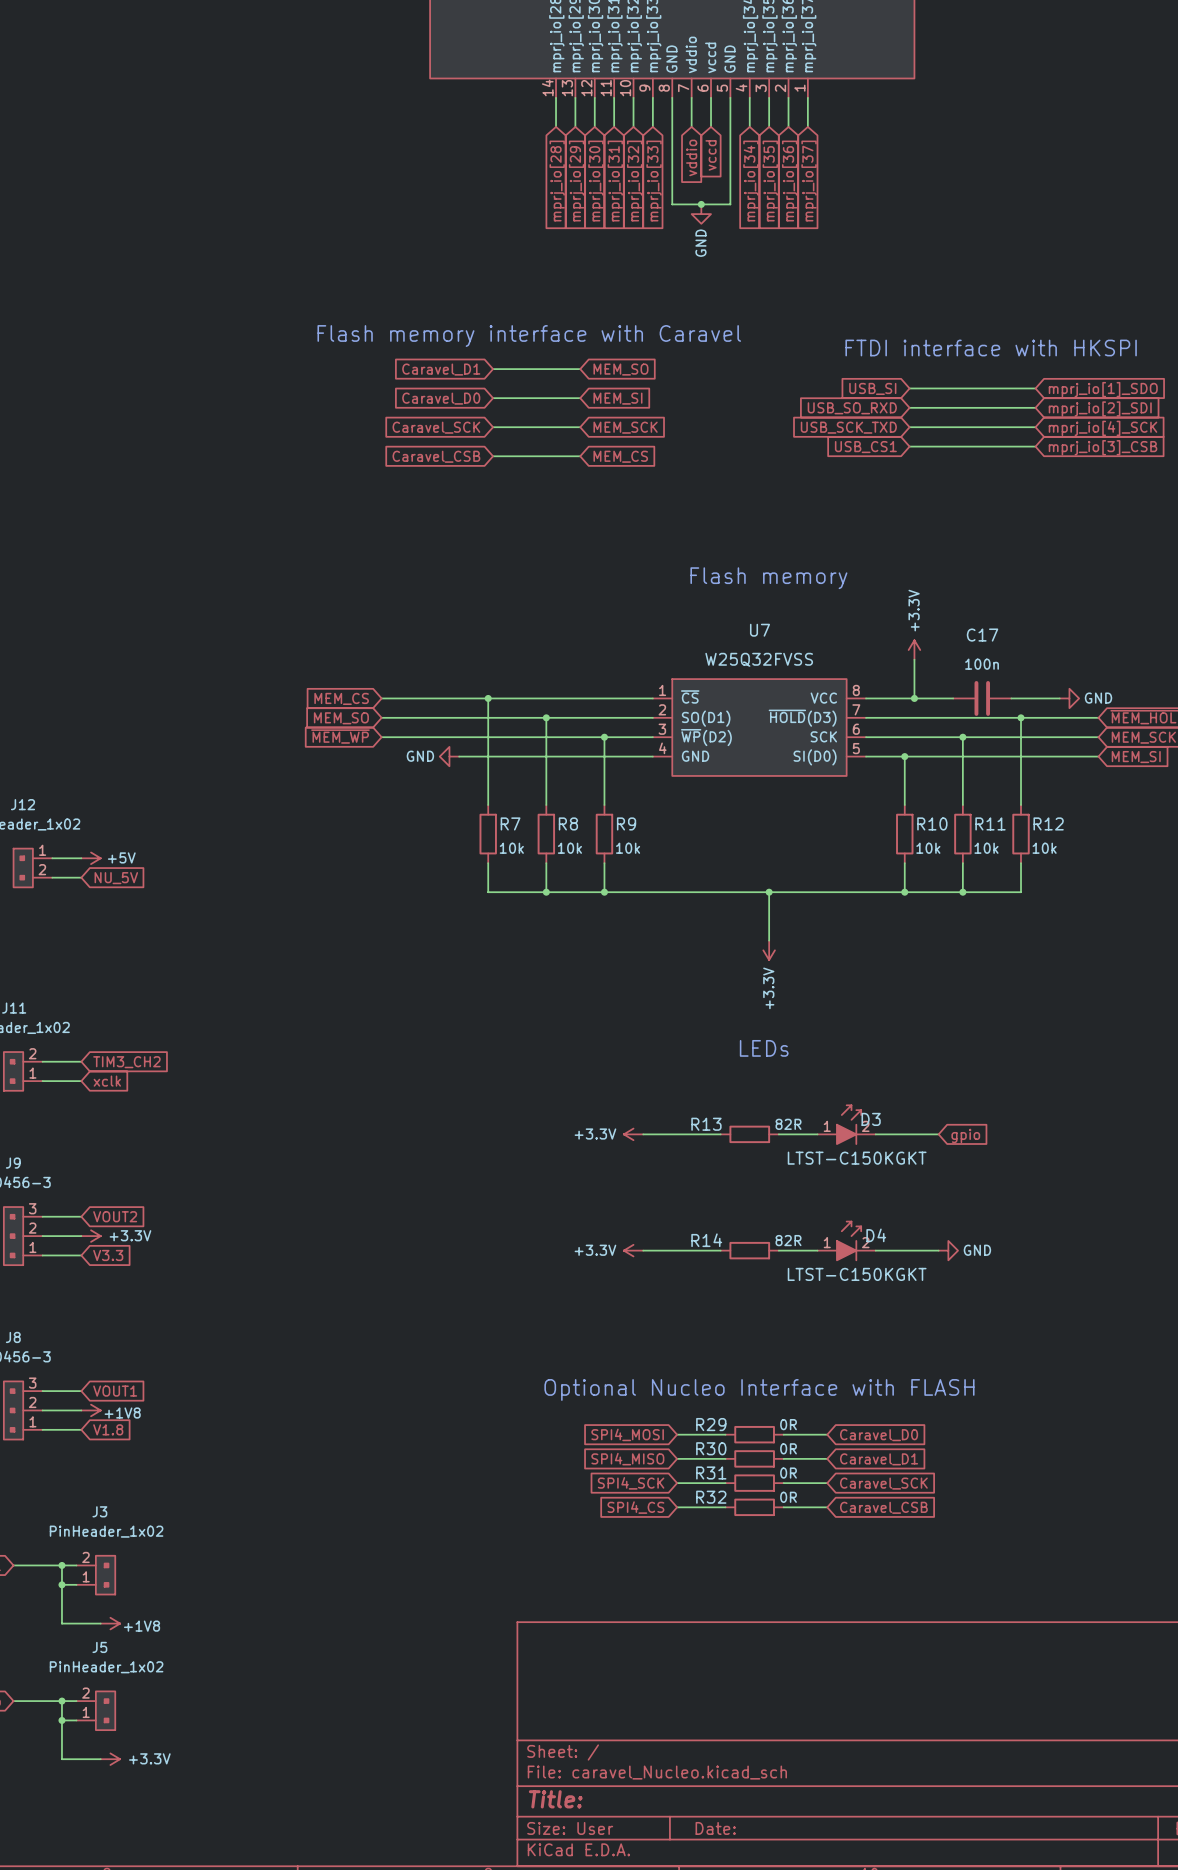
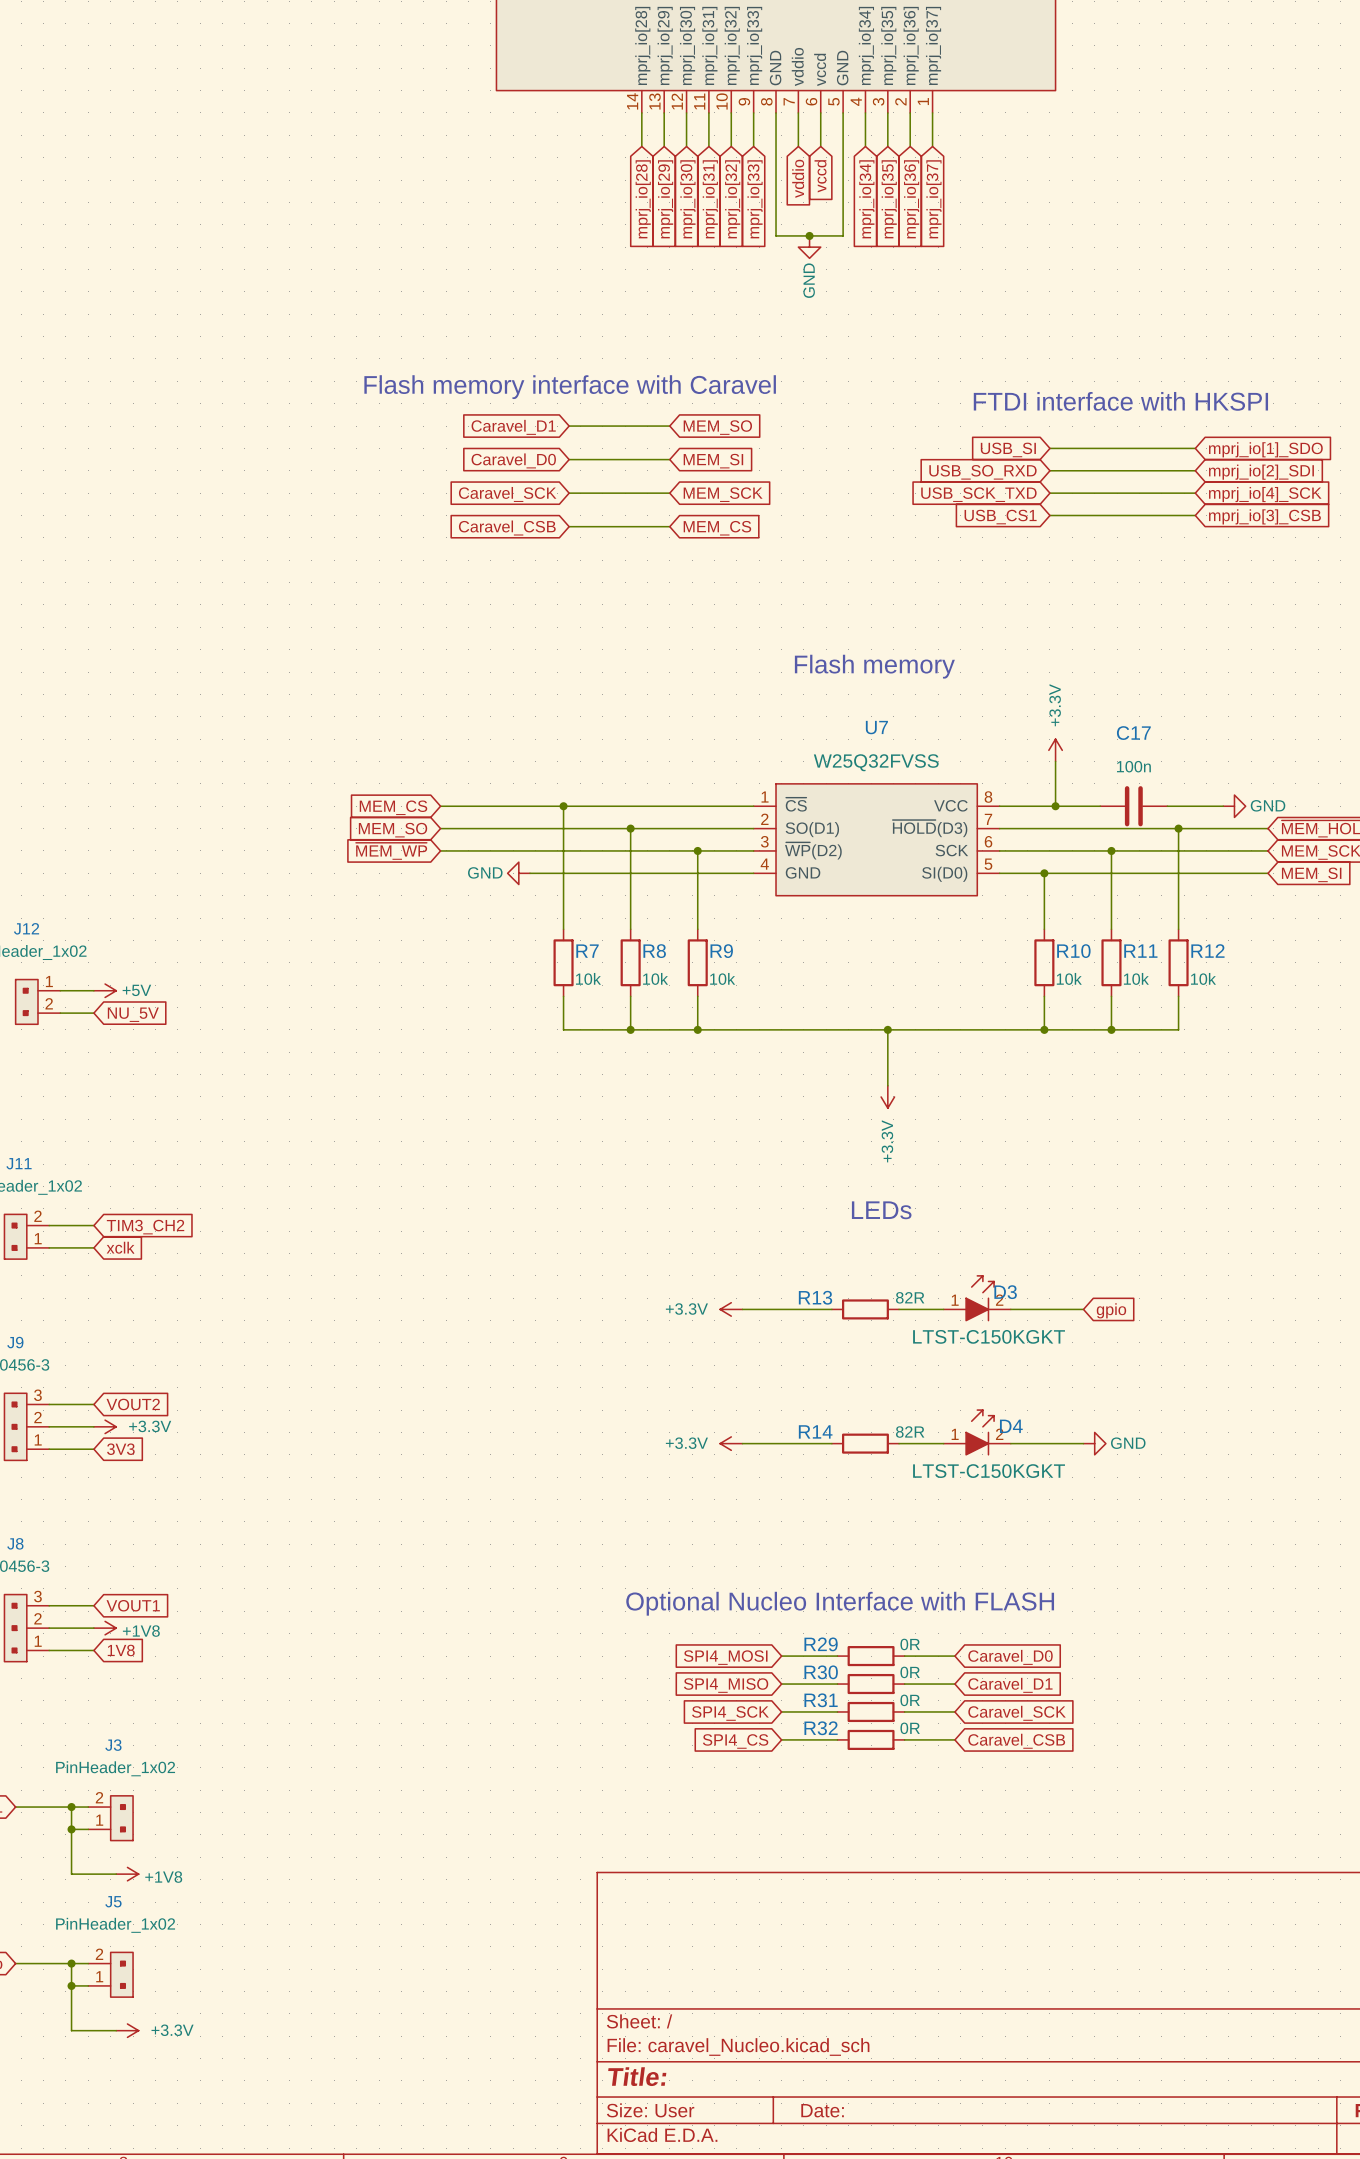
global label: V3.3 (108, 1255) -> 3V3 (120, 1449)
global label: V1.8 (108, 1429) -> 1V8 (121, 1650)

